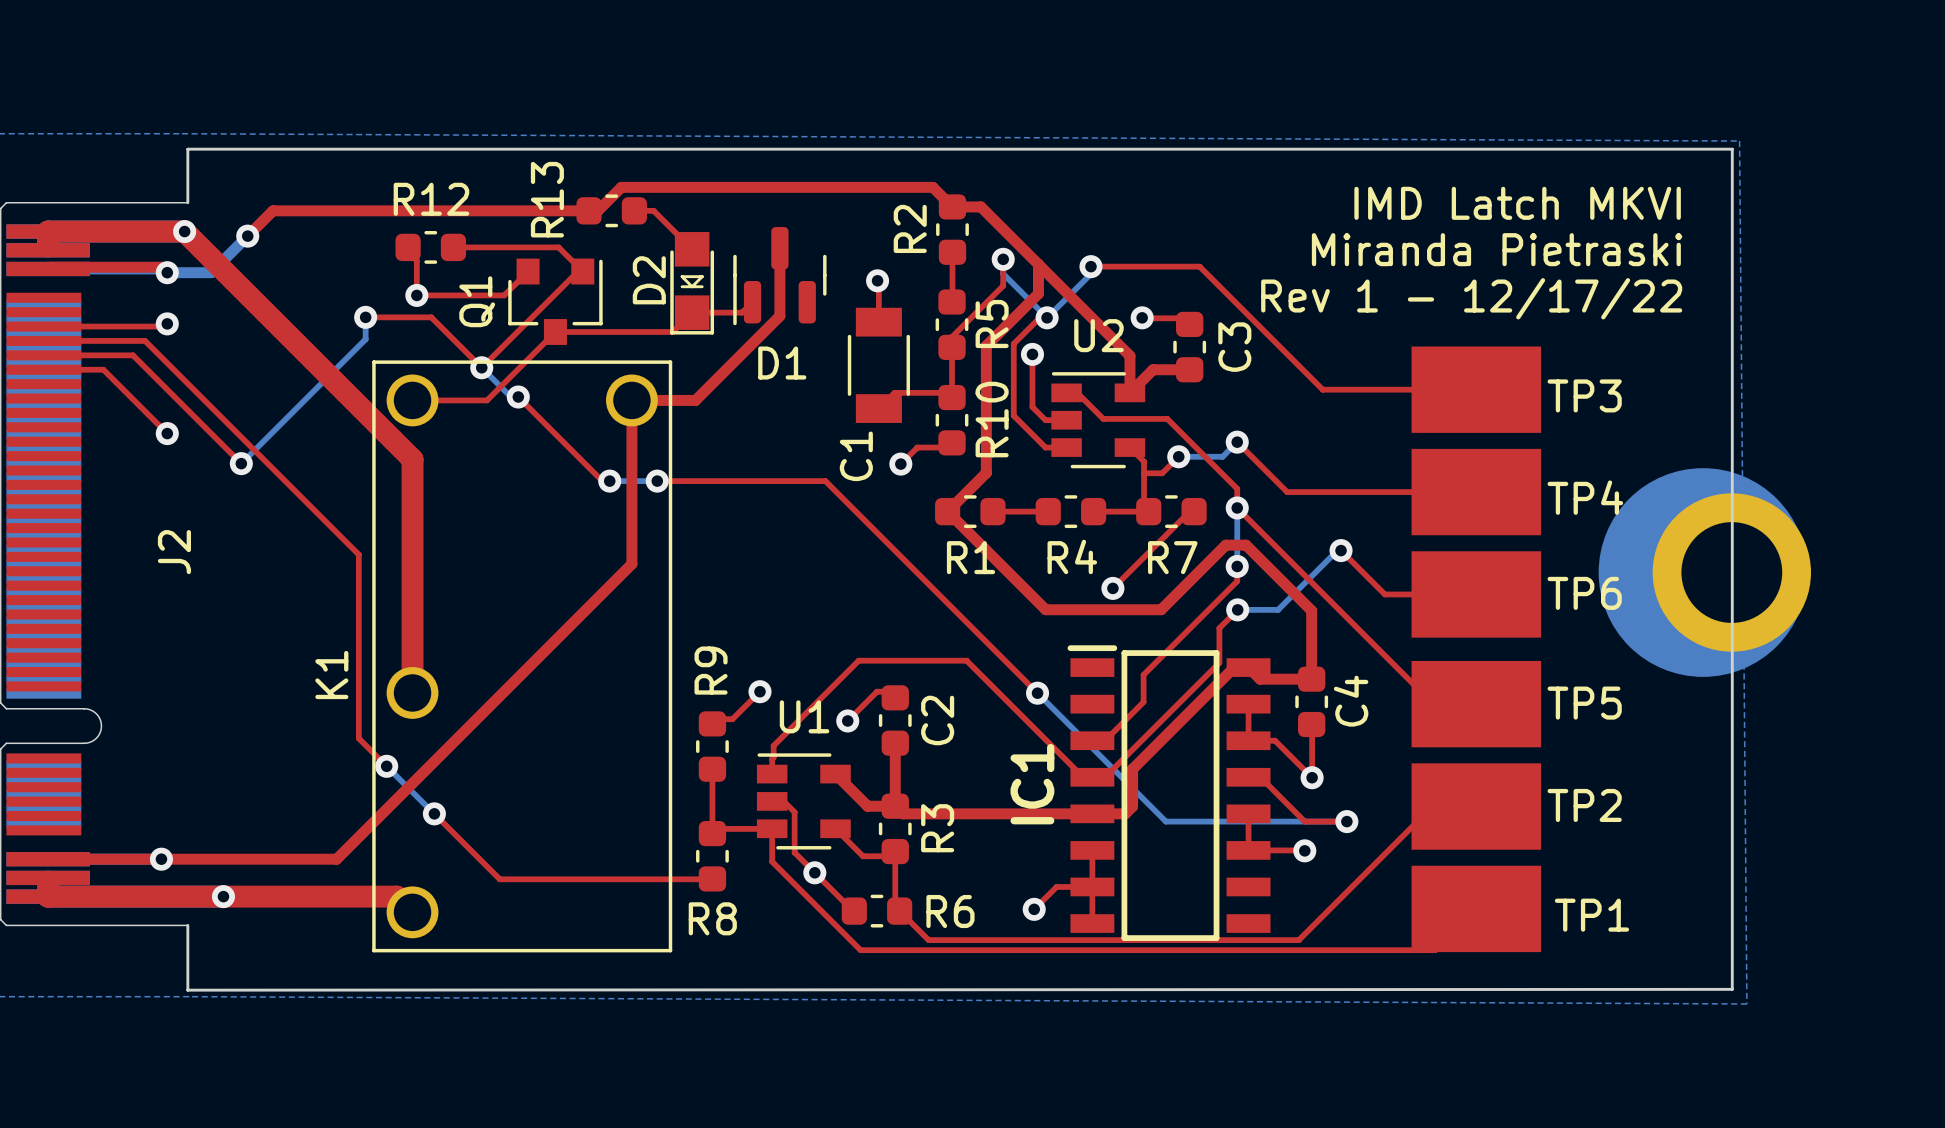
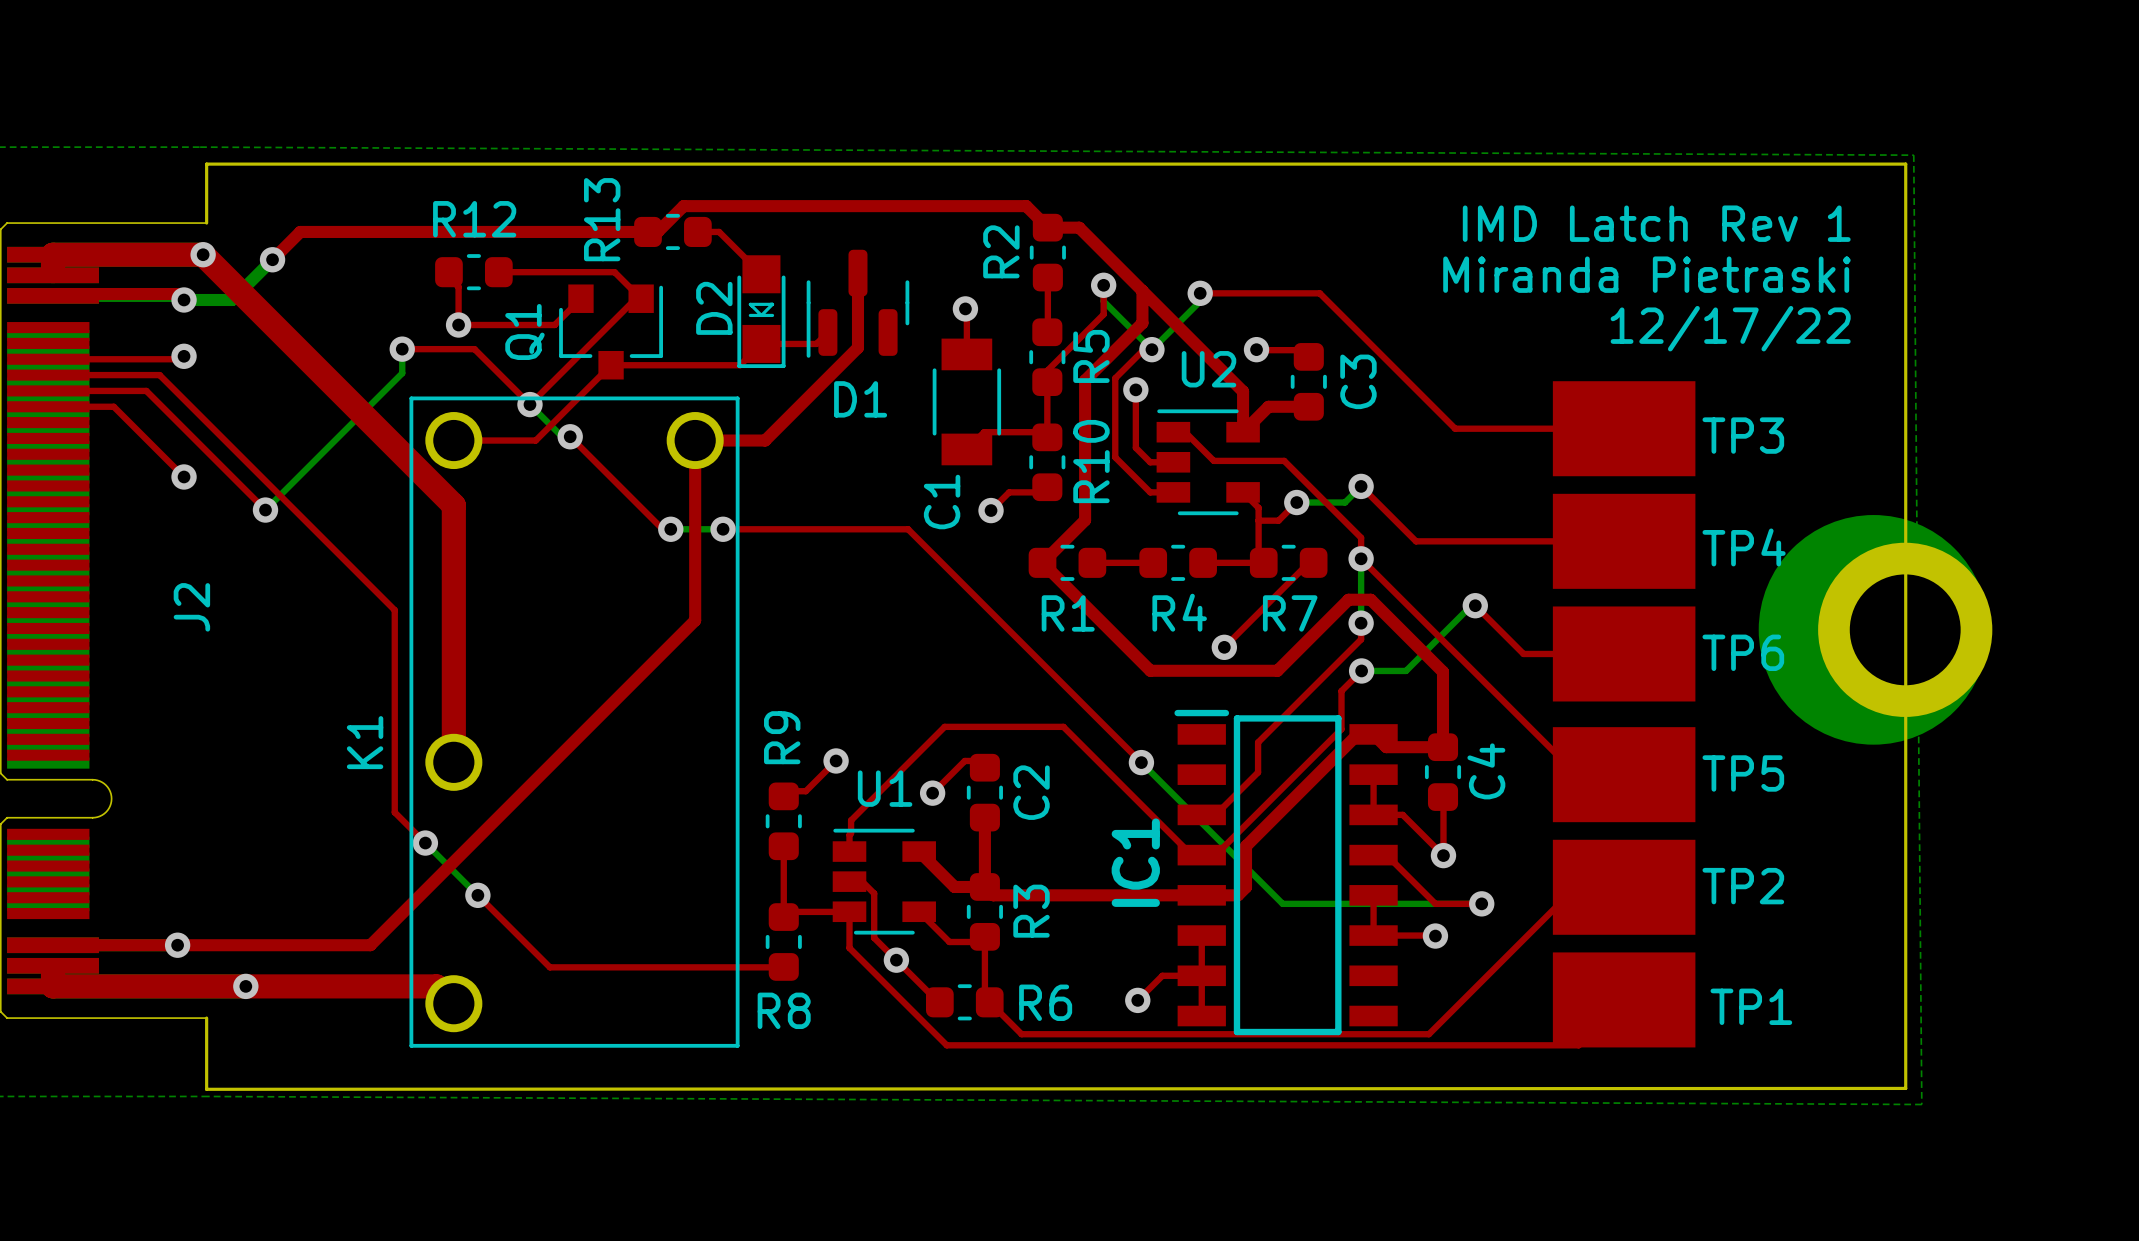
text: IMD Latch MKVI (1517, 203) -> IMD Latch Rev 1 (1656, 223)
text: Rev 1 - 12/17/22 (1471, 298) -> 12/17/22 (1730, 328)

